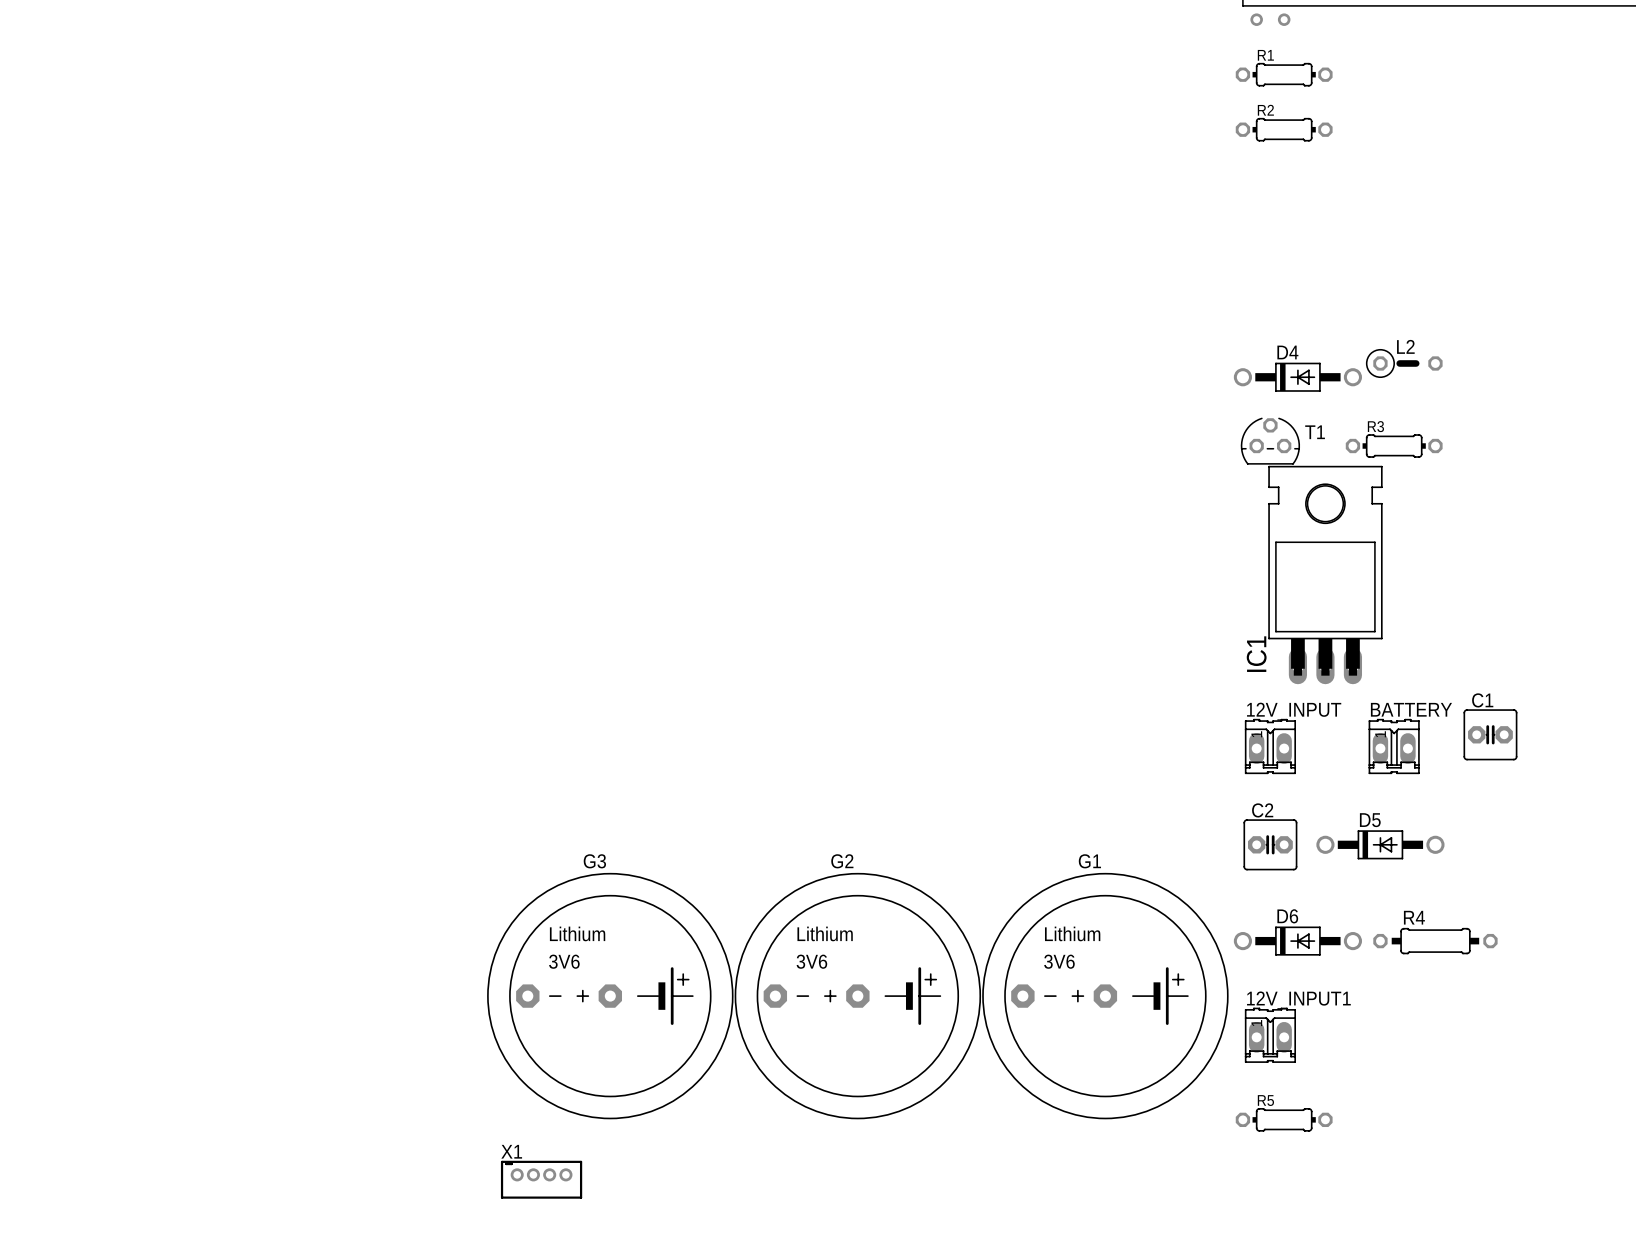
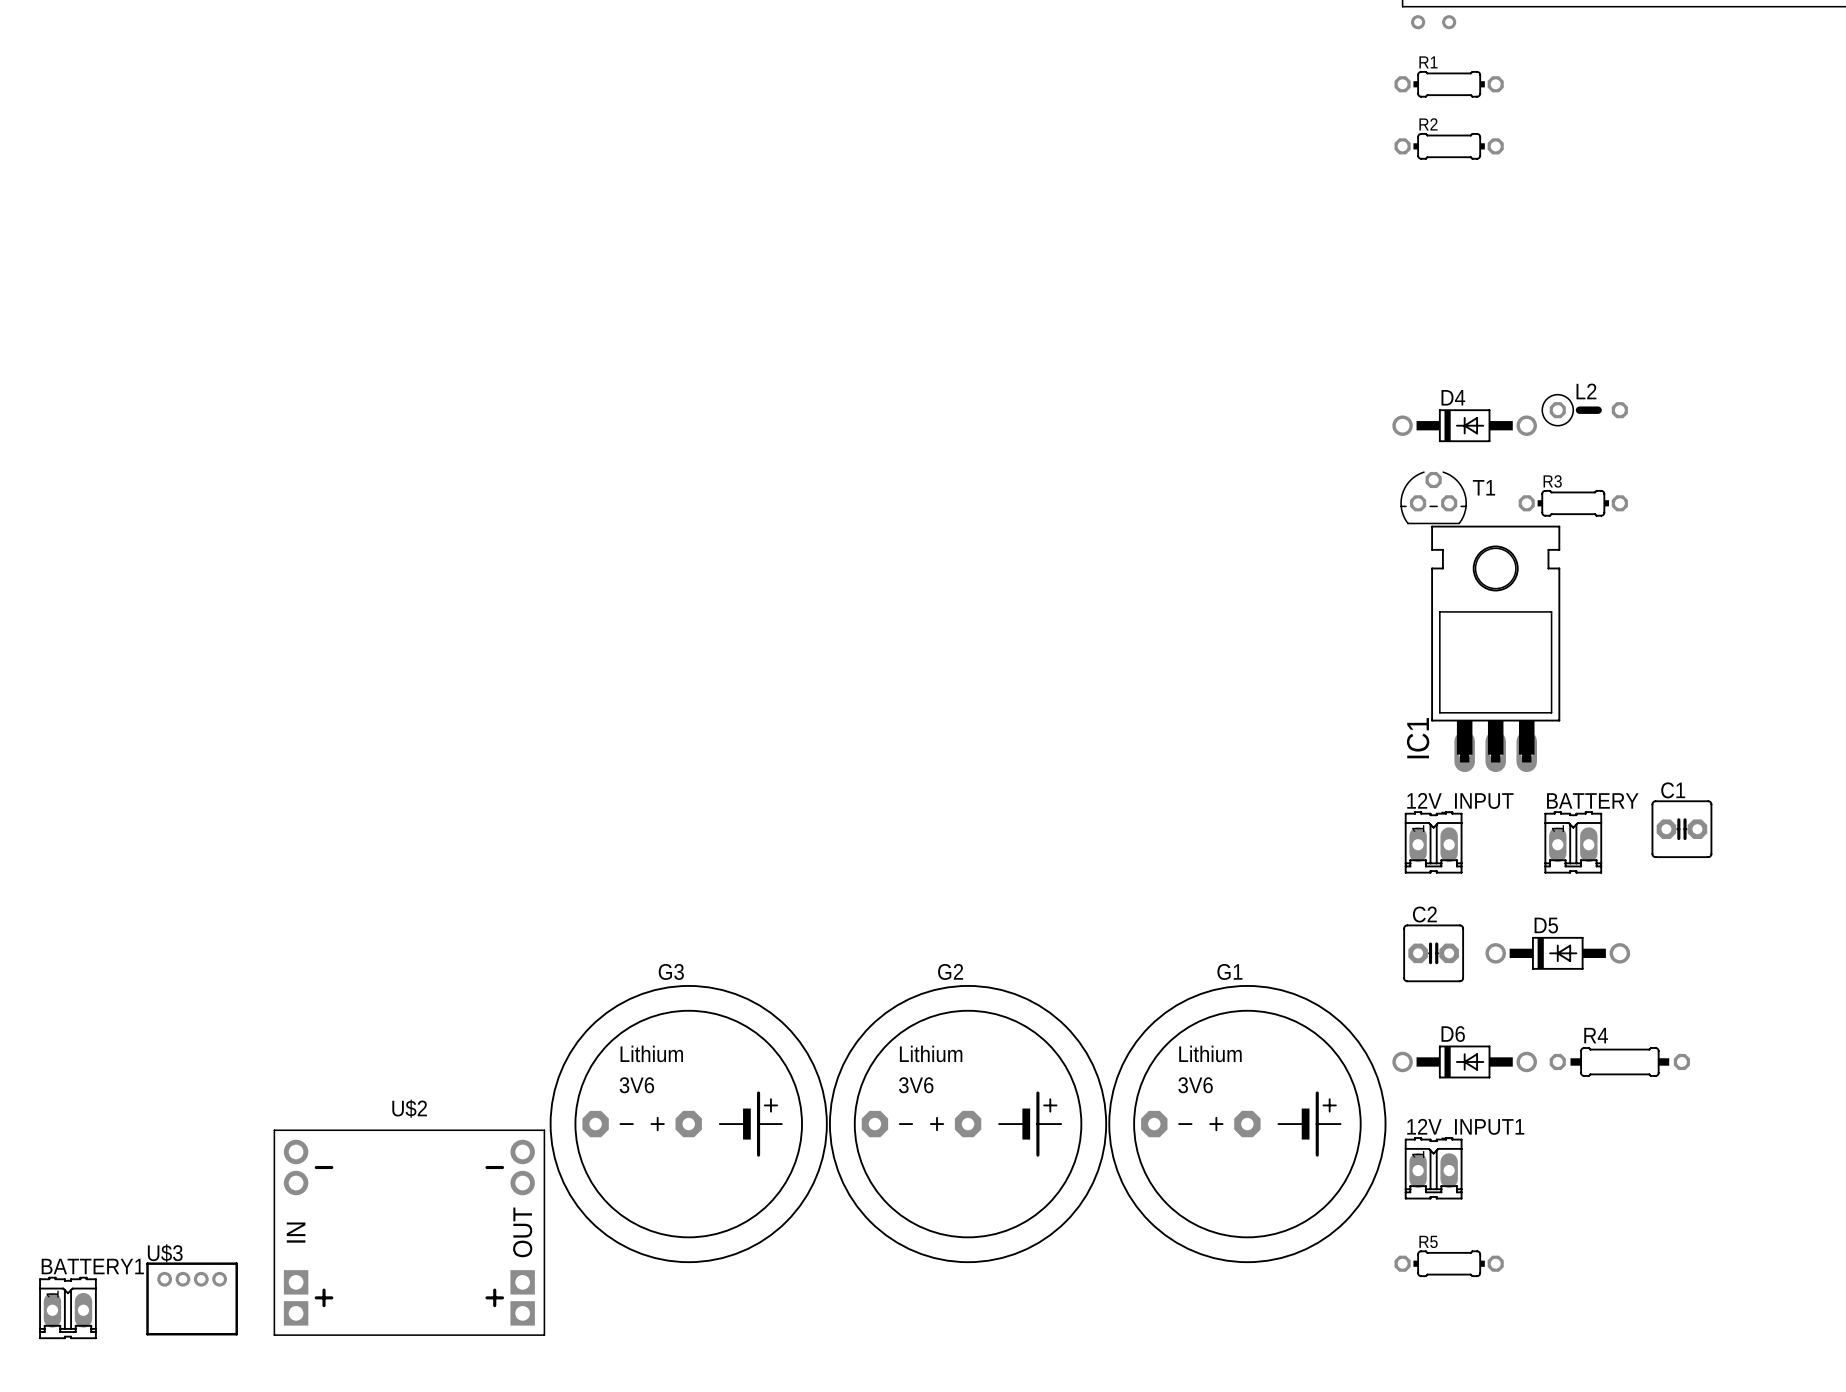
U$2: none -> (409, 1232)
U$3: none -> (192, 1298)
BATTERY1: none -> (67, 1307)
X1: (541, 1179) -> none

